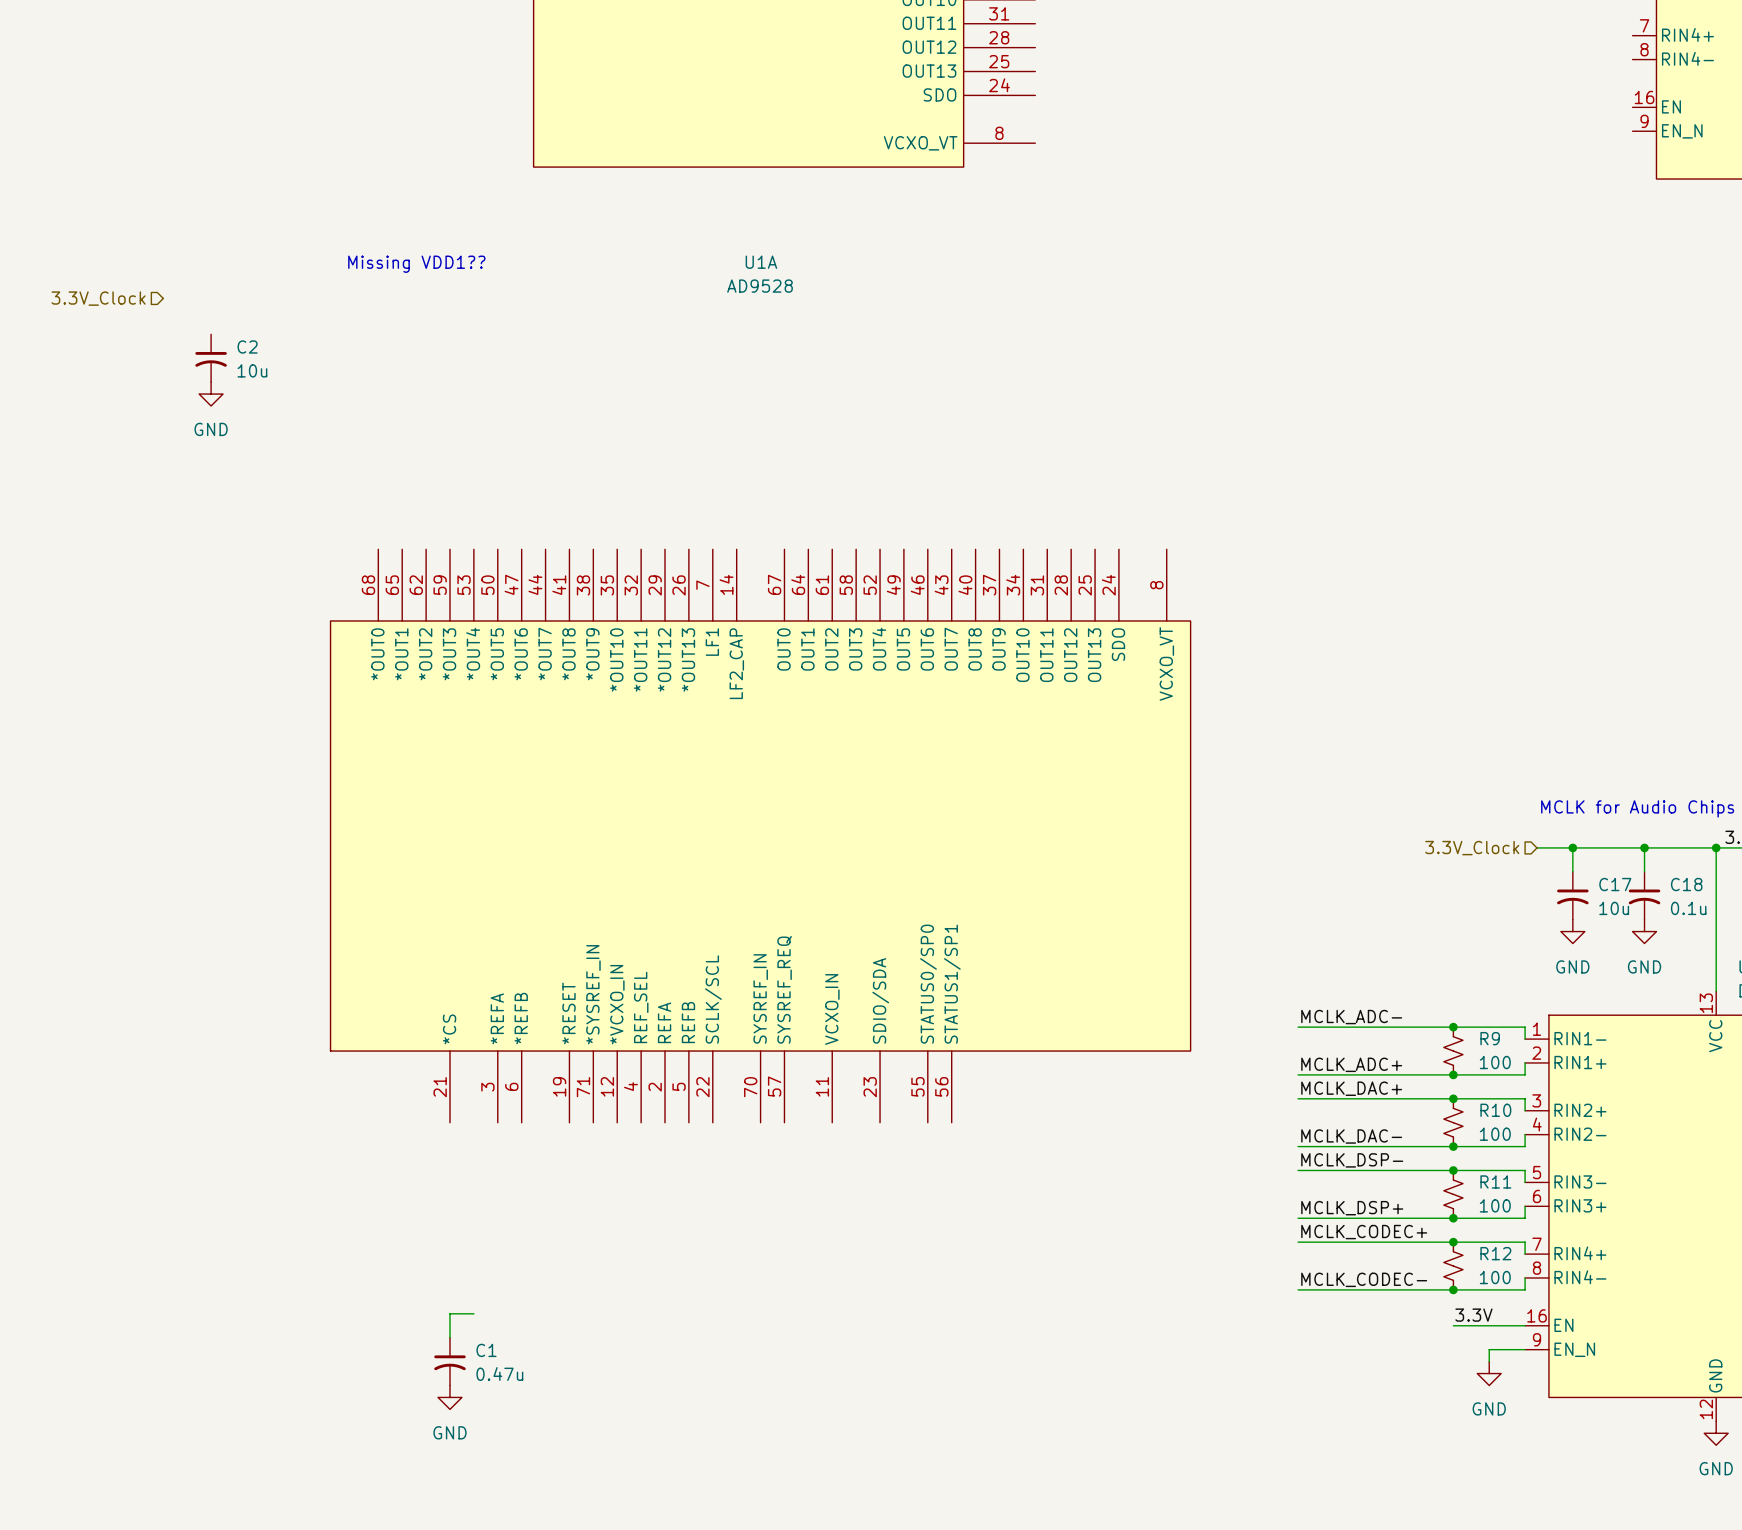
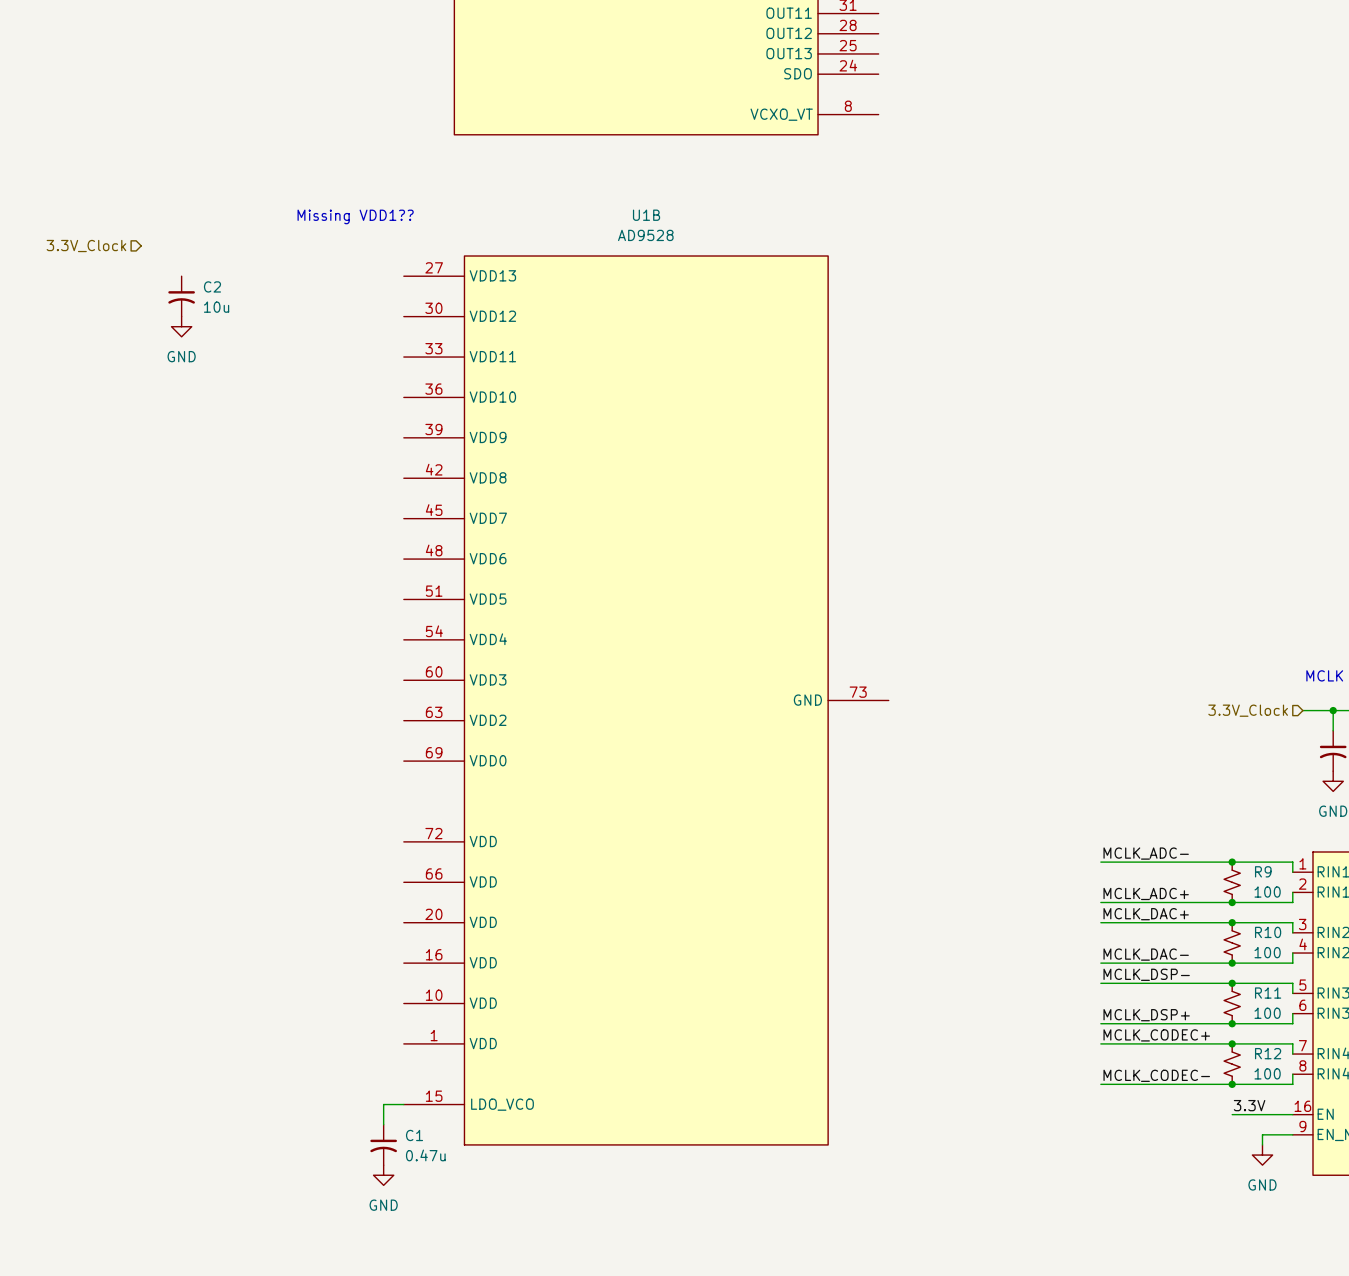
U1A: AD9528 (760, 836) -> none
U1B: none -> AD9528 (646, 700)

